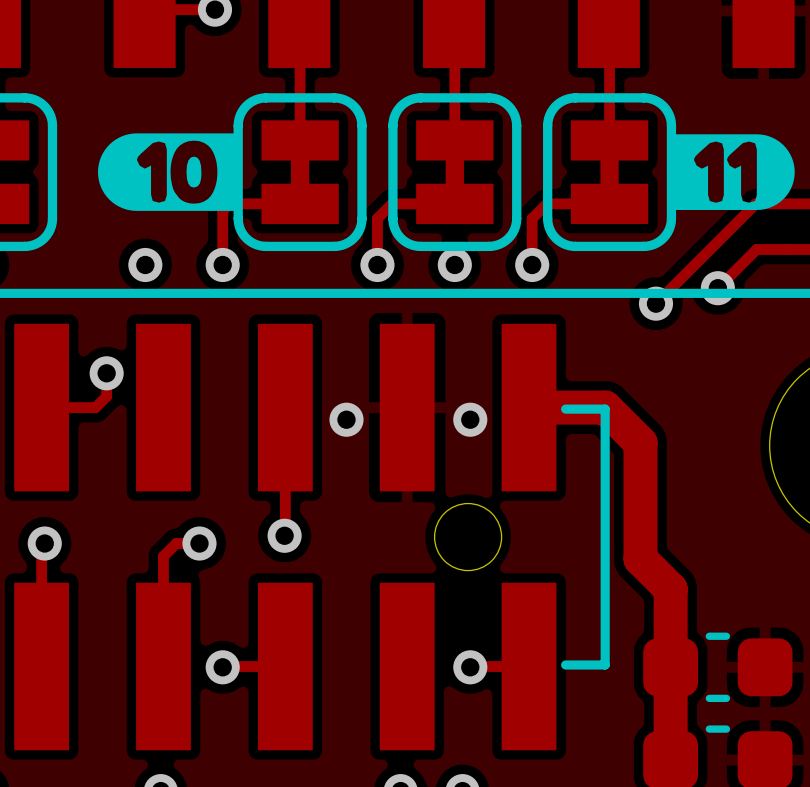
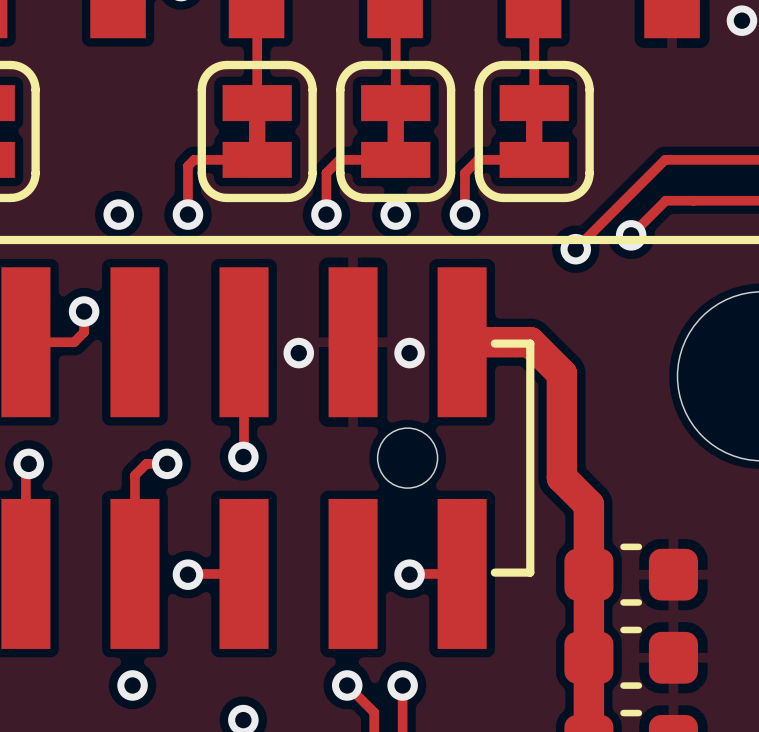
drawing: [97, 133, 240, 211] -> none
drawing: [671, 134, 795, 211] -> none

